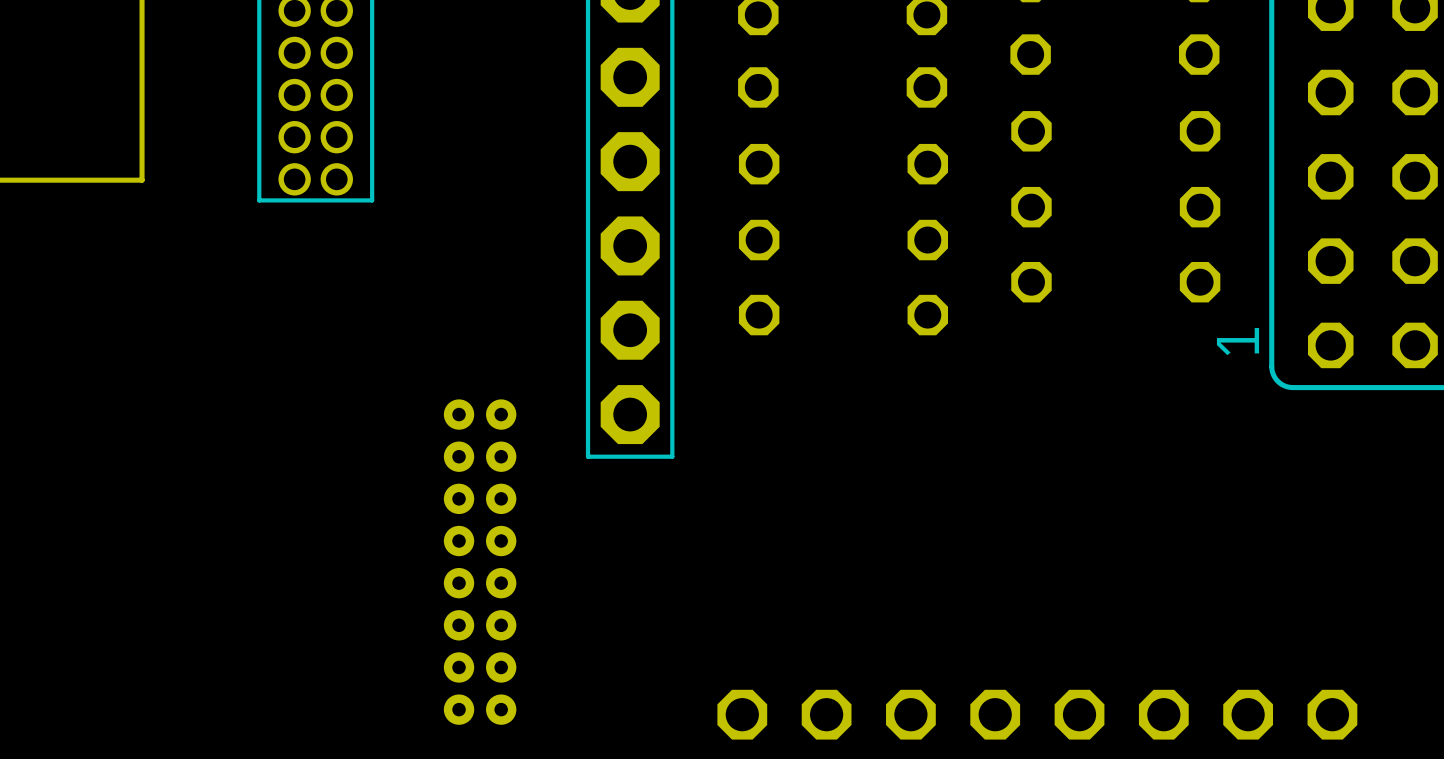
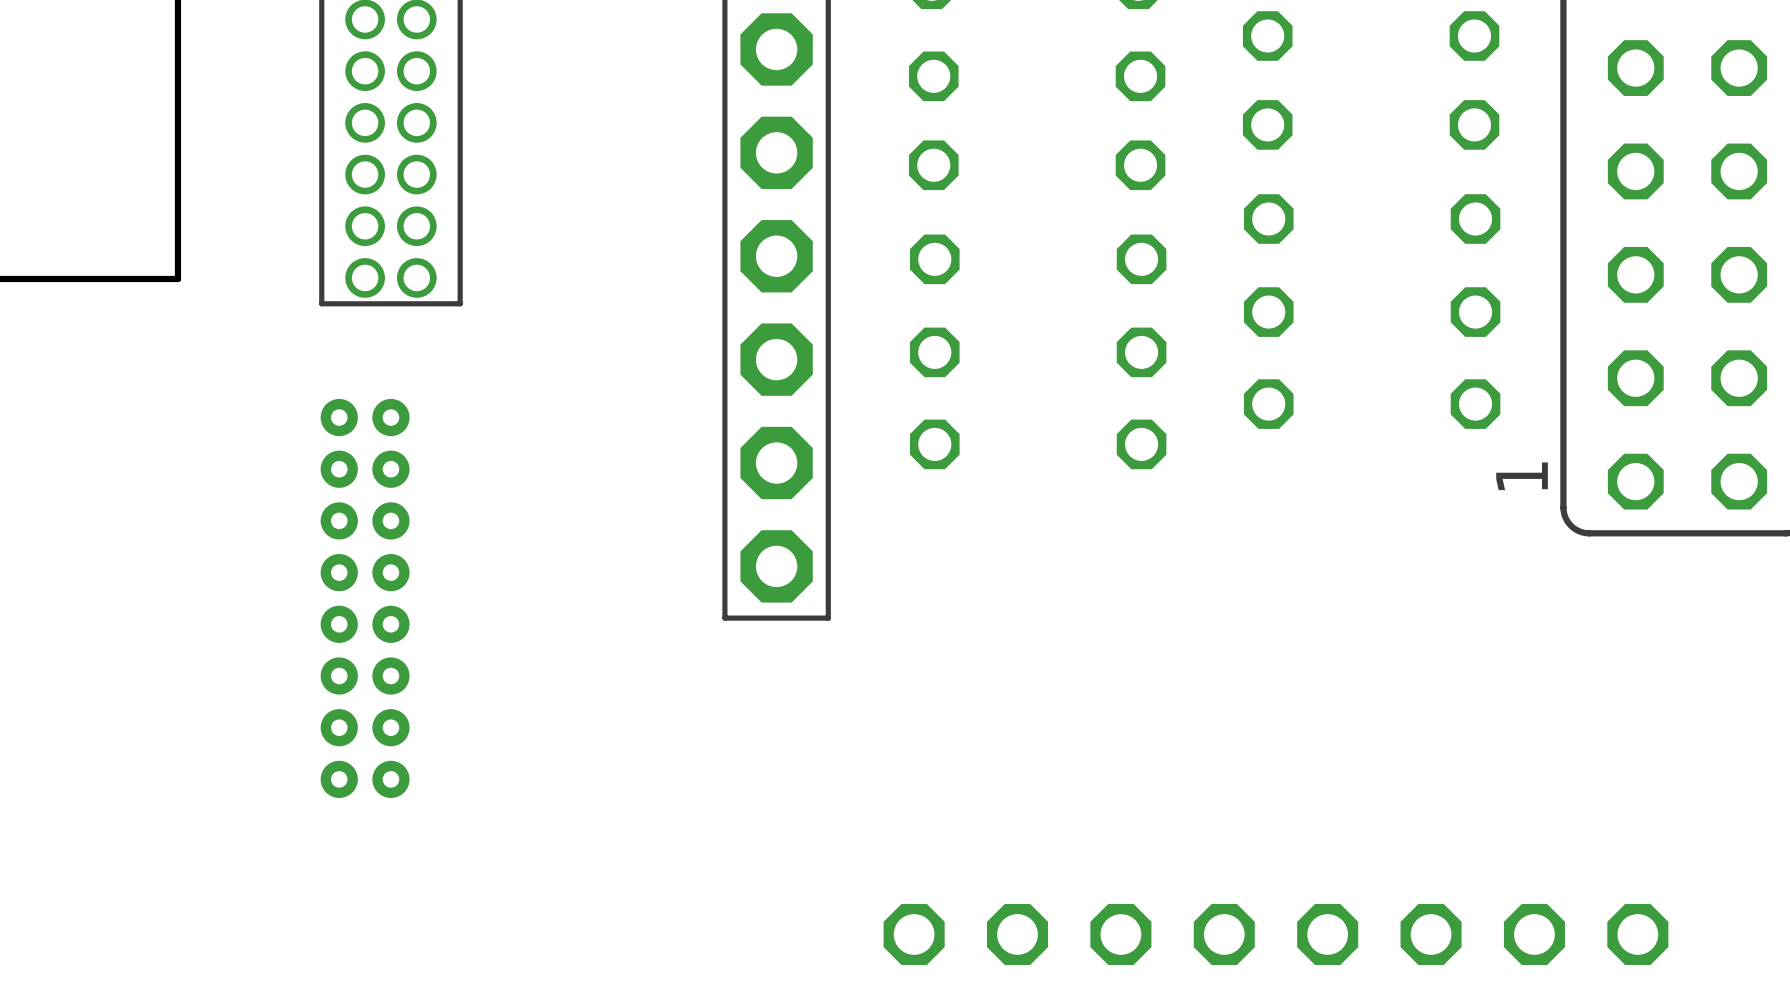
part position: (480, 562) -> (365, 598)

